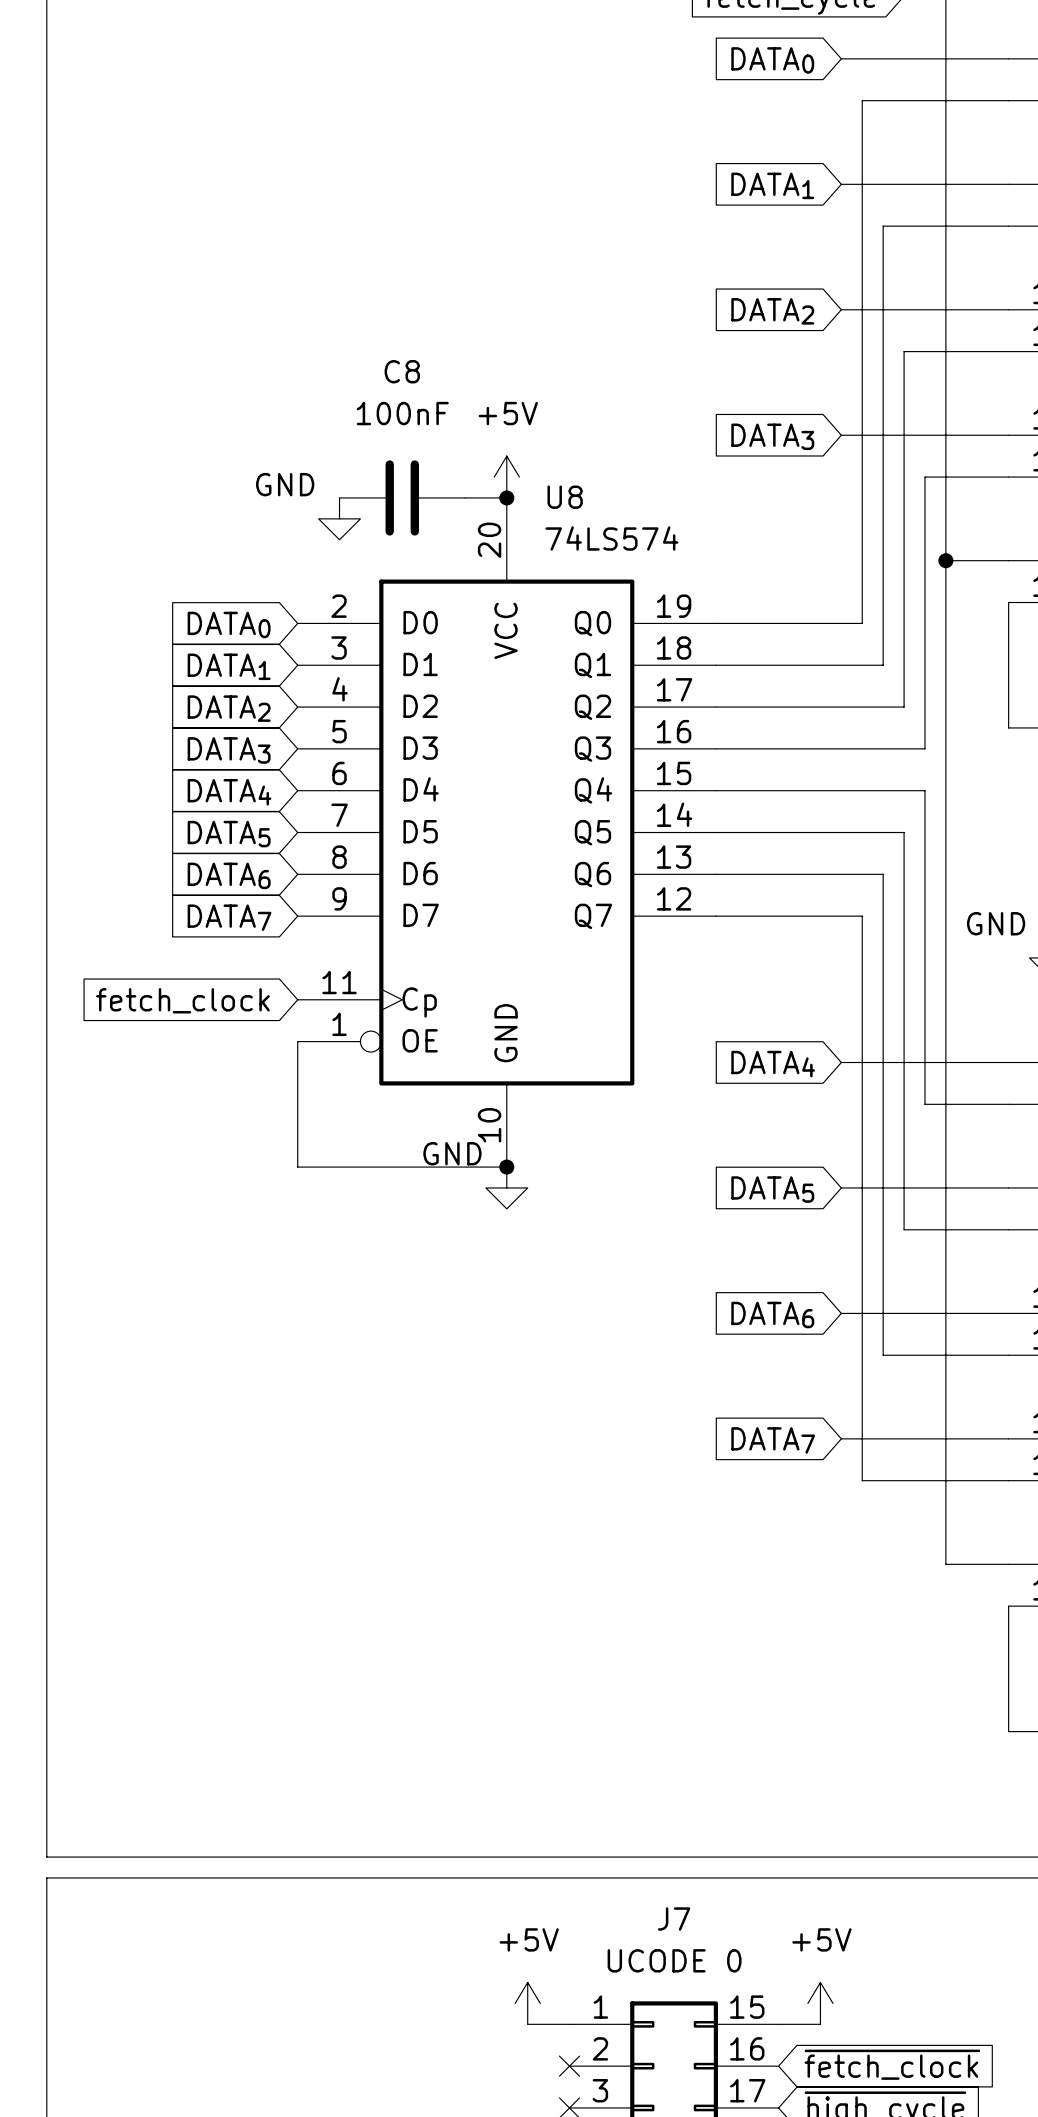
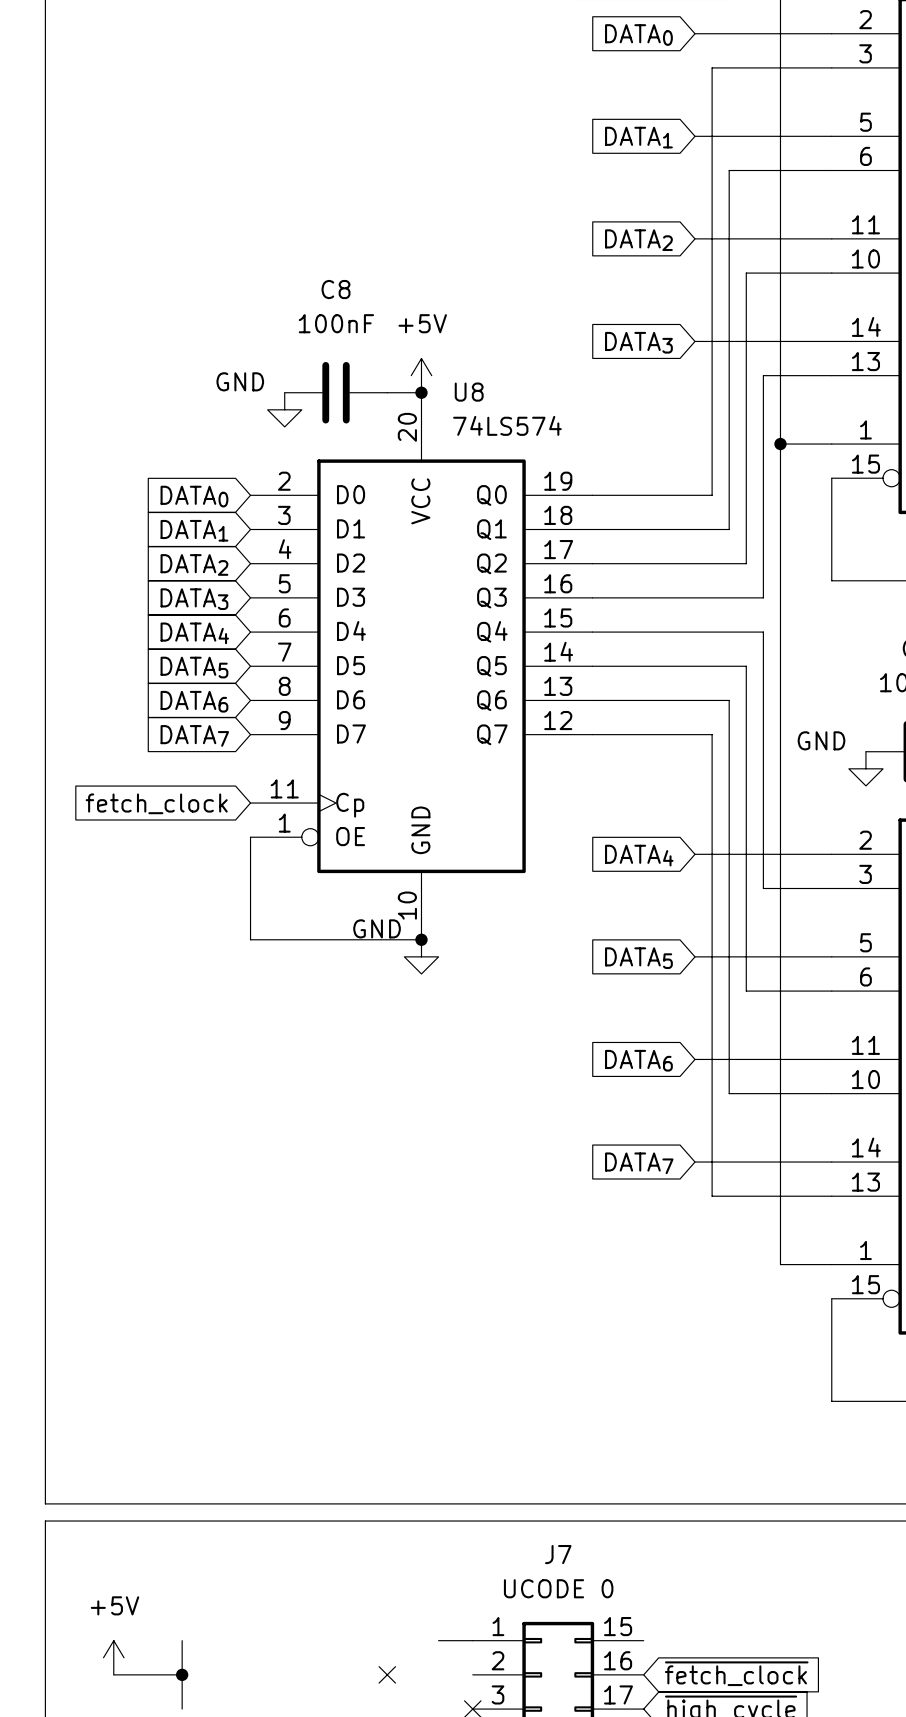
power symbol: +5V (527, 2003) -> none
power symbol: +5V (820, 2003) -> none
wire: none -> (182, 1640) (182, 1709)
wire: (778, 2024) (820, 2024) -> none
power symbol: none -> +5V (113, 1657)
wire: none -> (113, 1674) (182, 1674)
junction: none -> (182, 1674)
no-connect mark: none -> (387, 1674)
no-connect mark: (569, 2066) -> none

